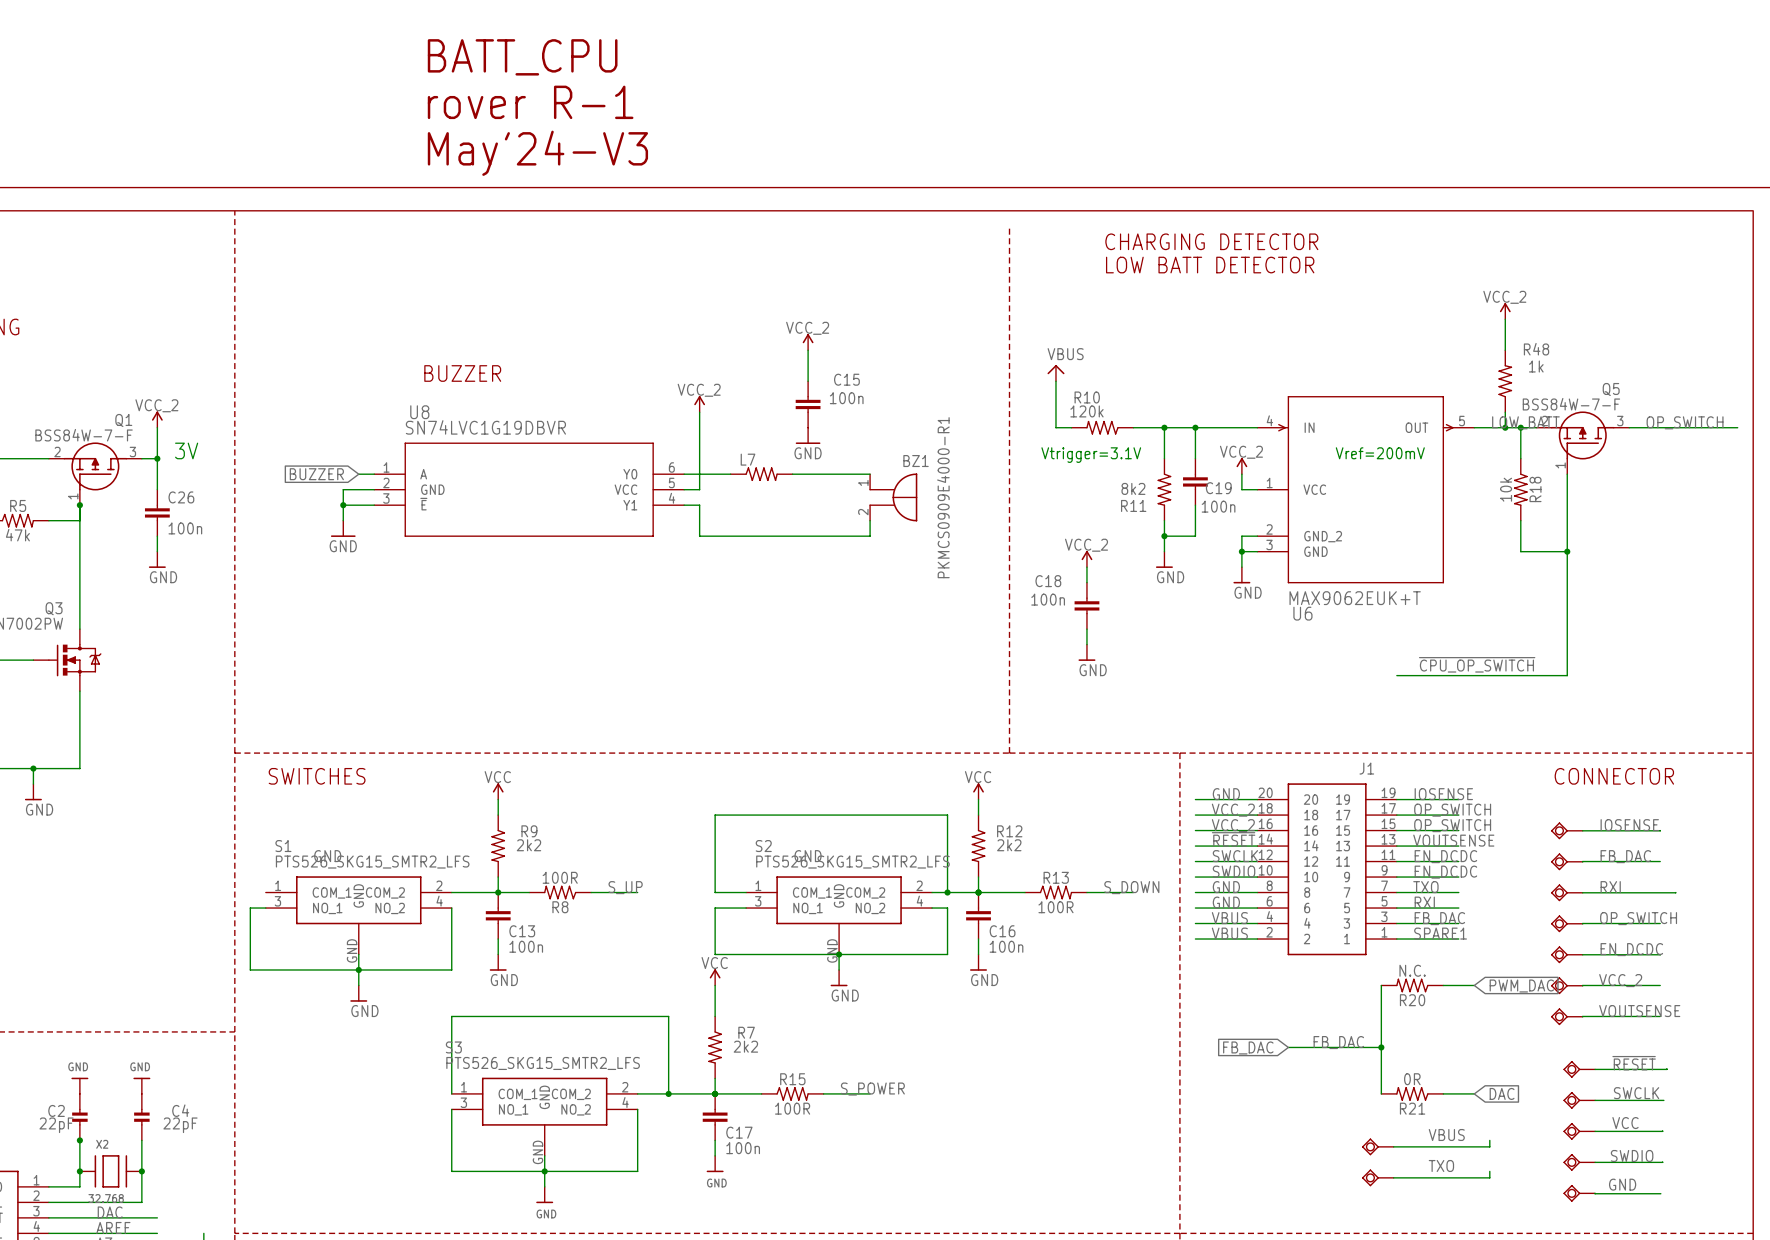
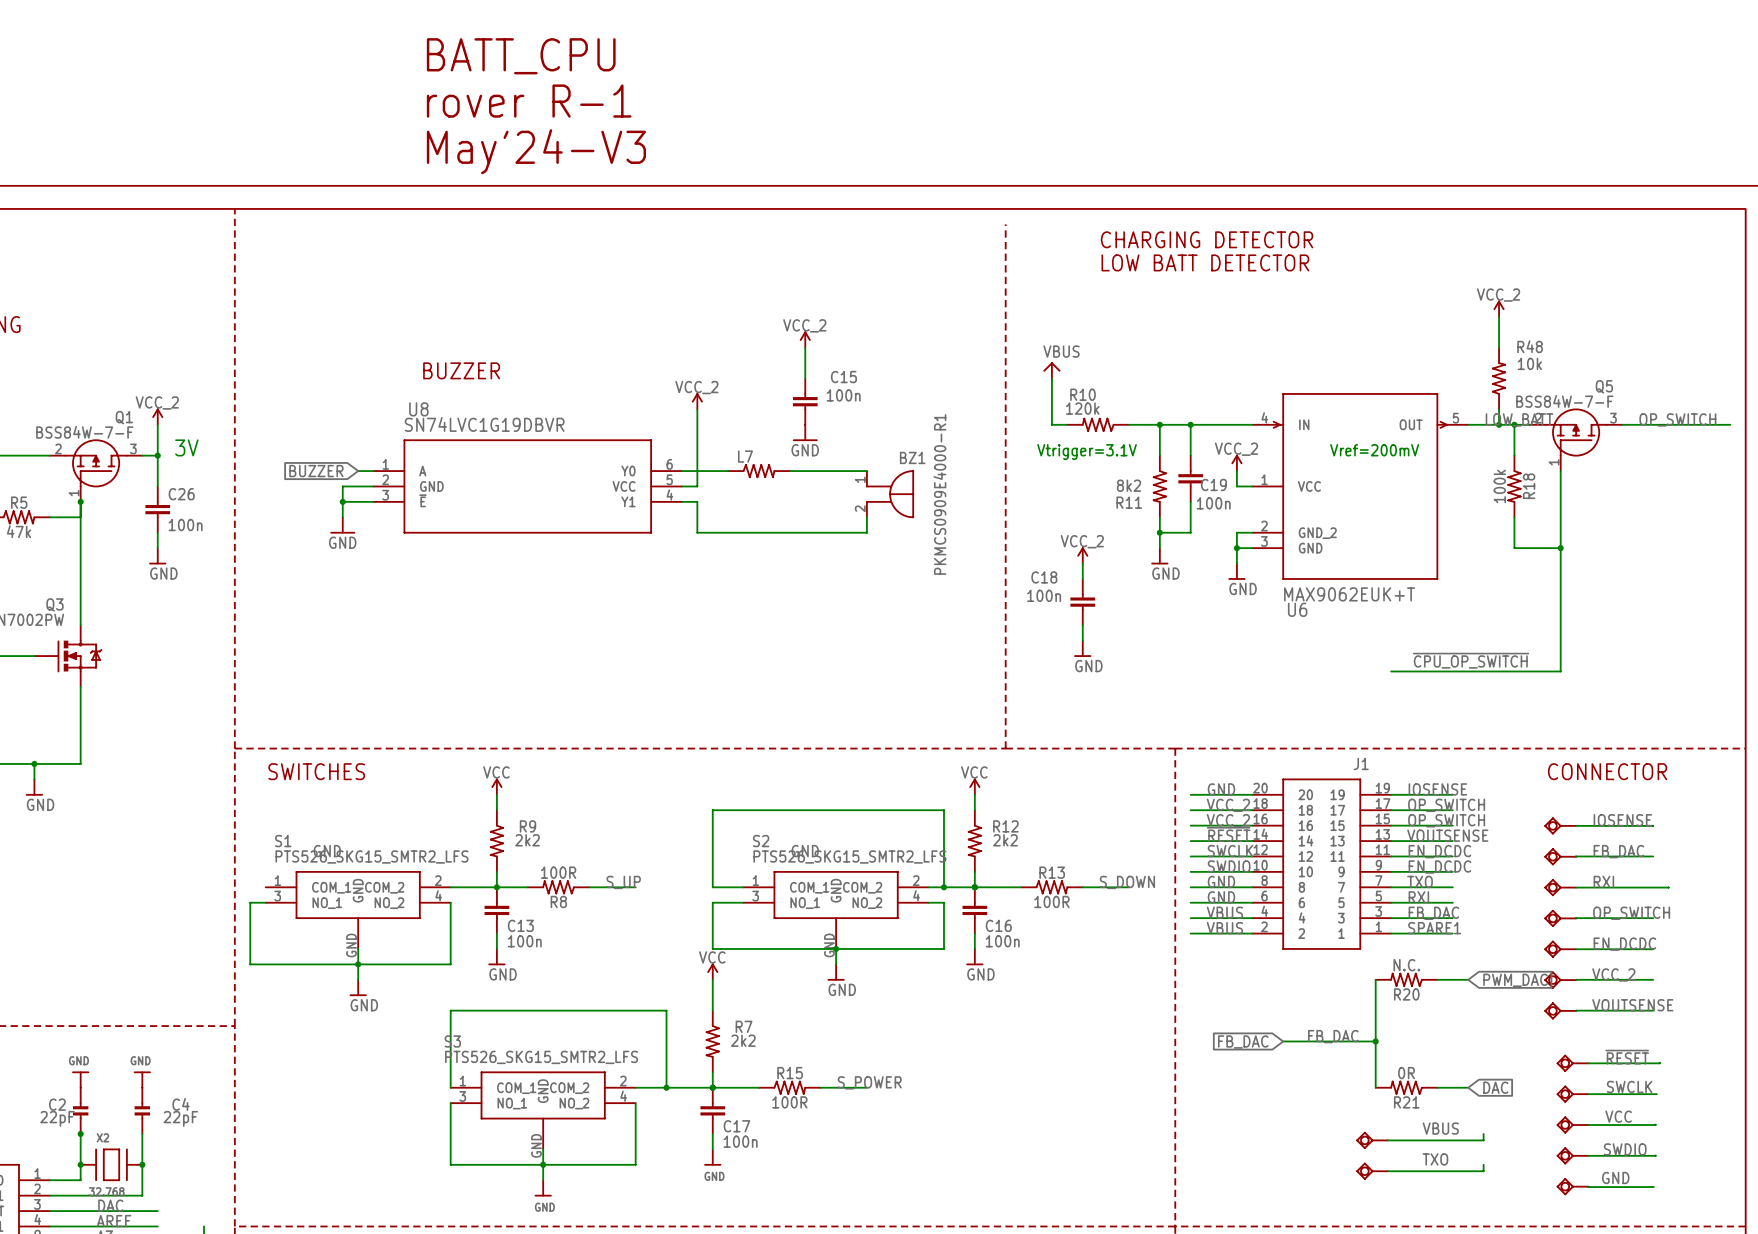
R48 value: 1k (1536, 366) -> 10k (1529, 363)
R18 value: 10k (1506, 489) -> 100k (1499, 486)

